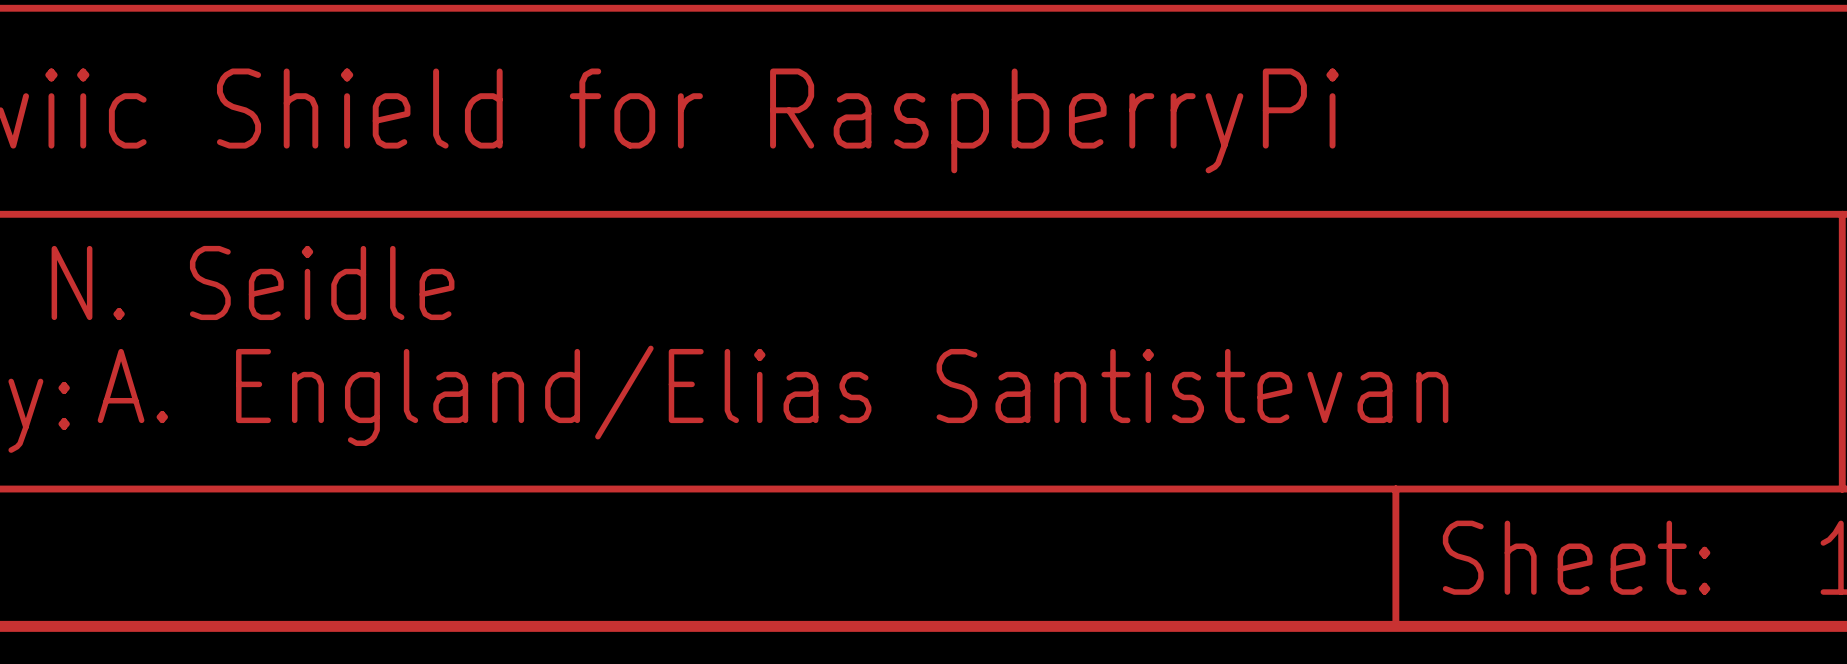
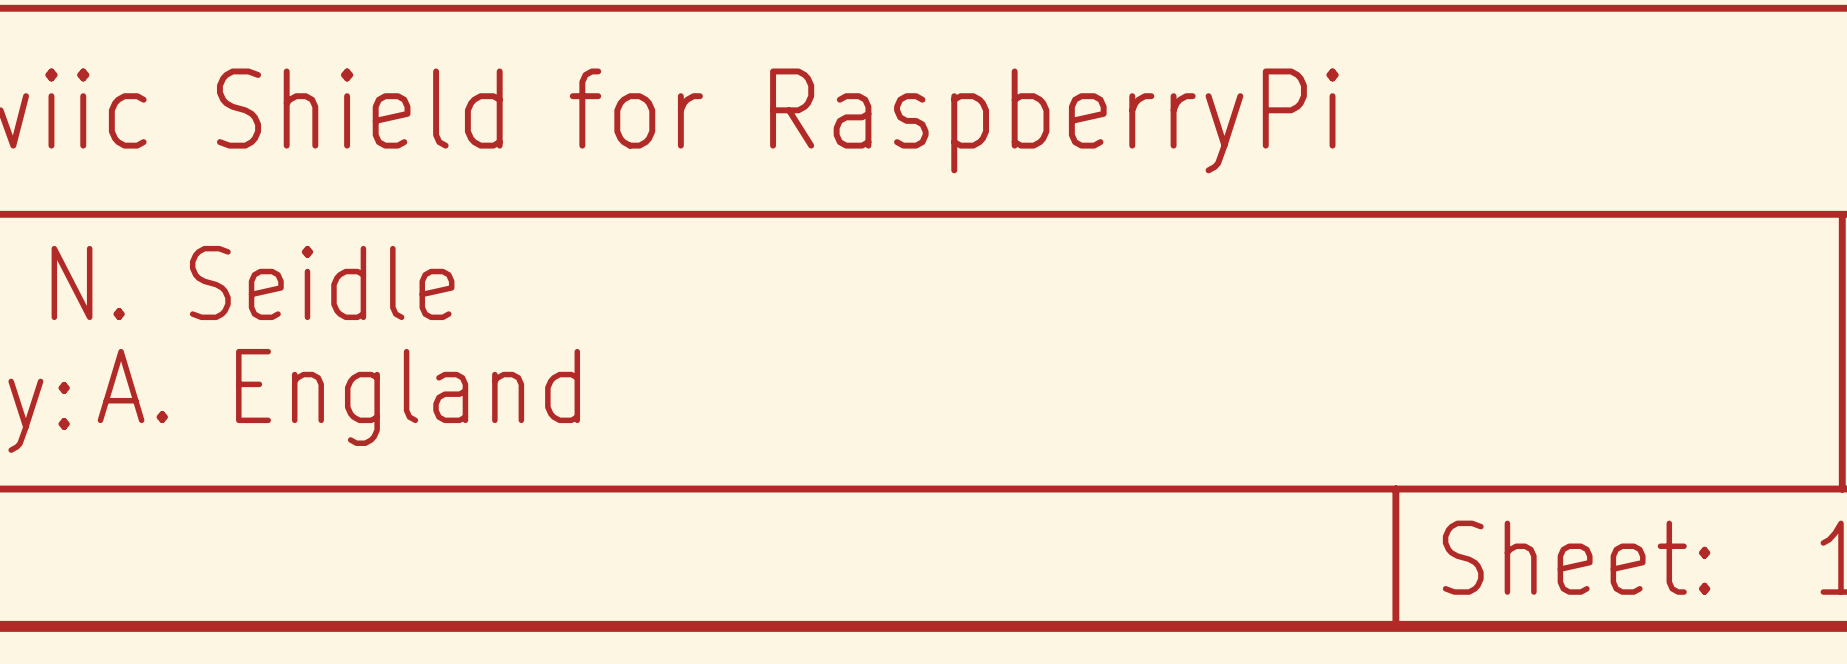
text: A. England/Elias Santistevan (773, 395) -> A. England (338, 397)

